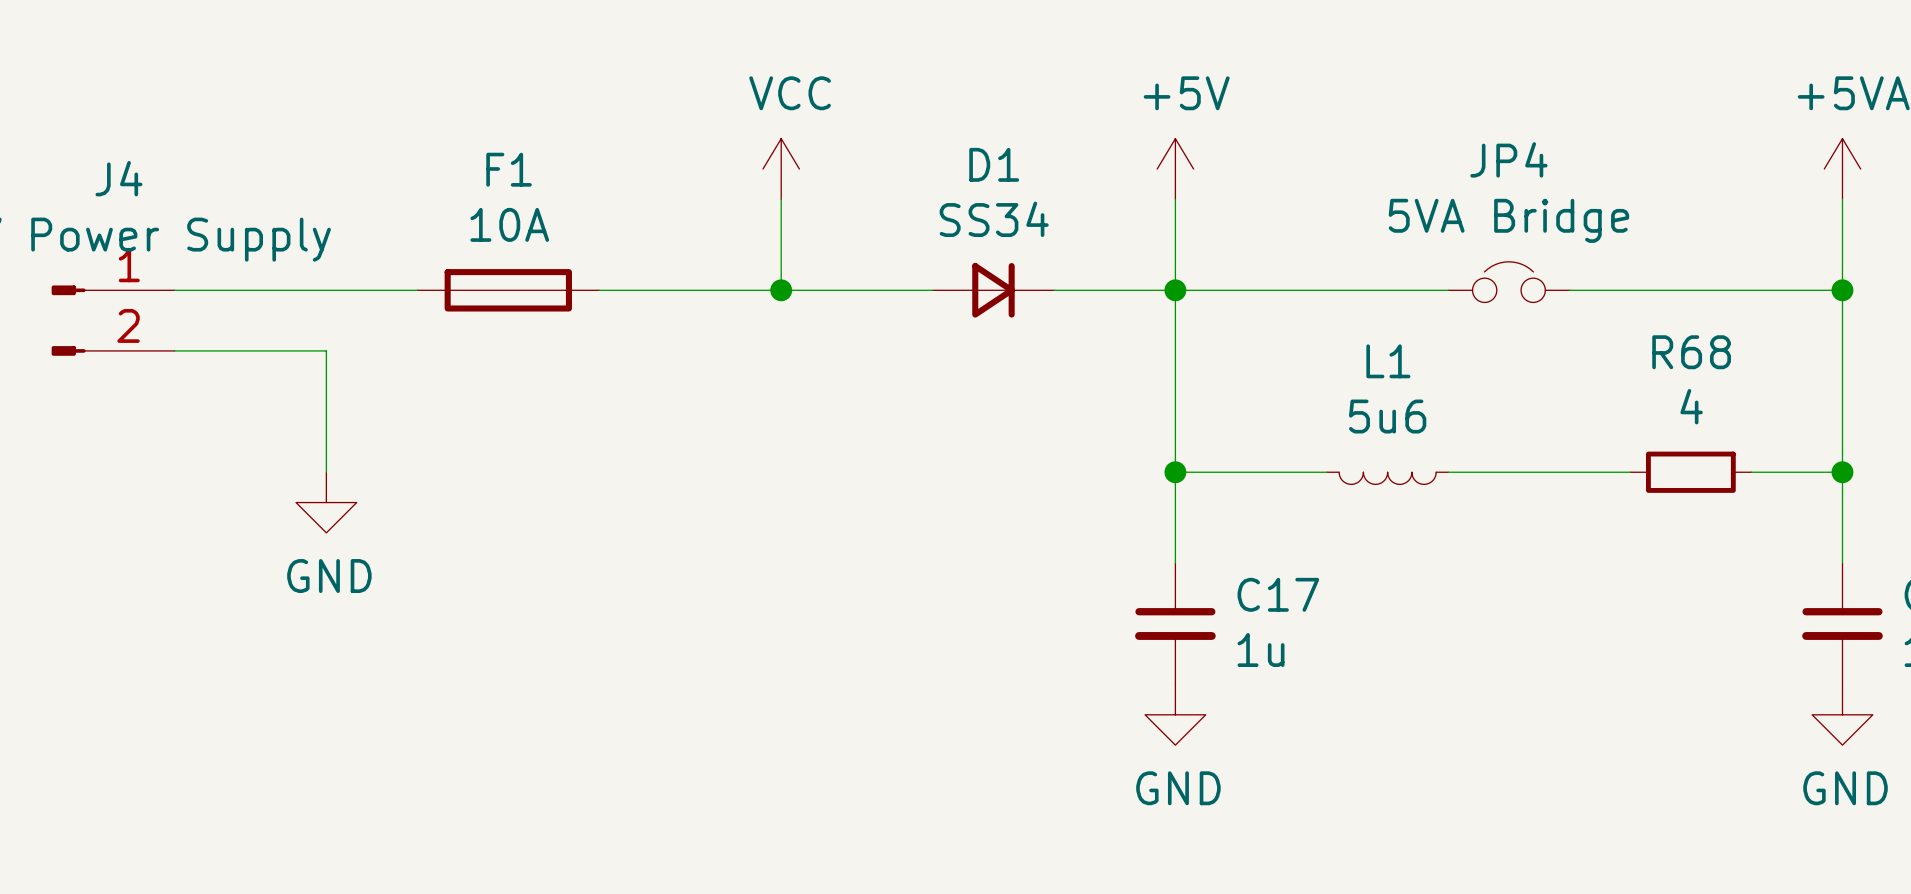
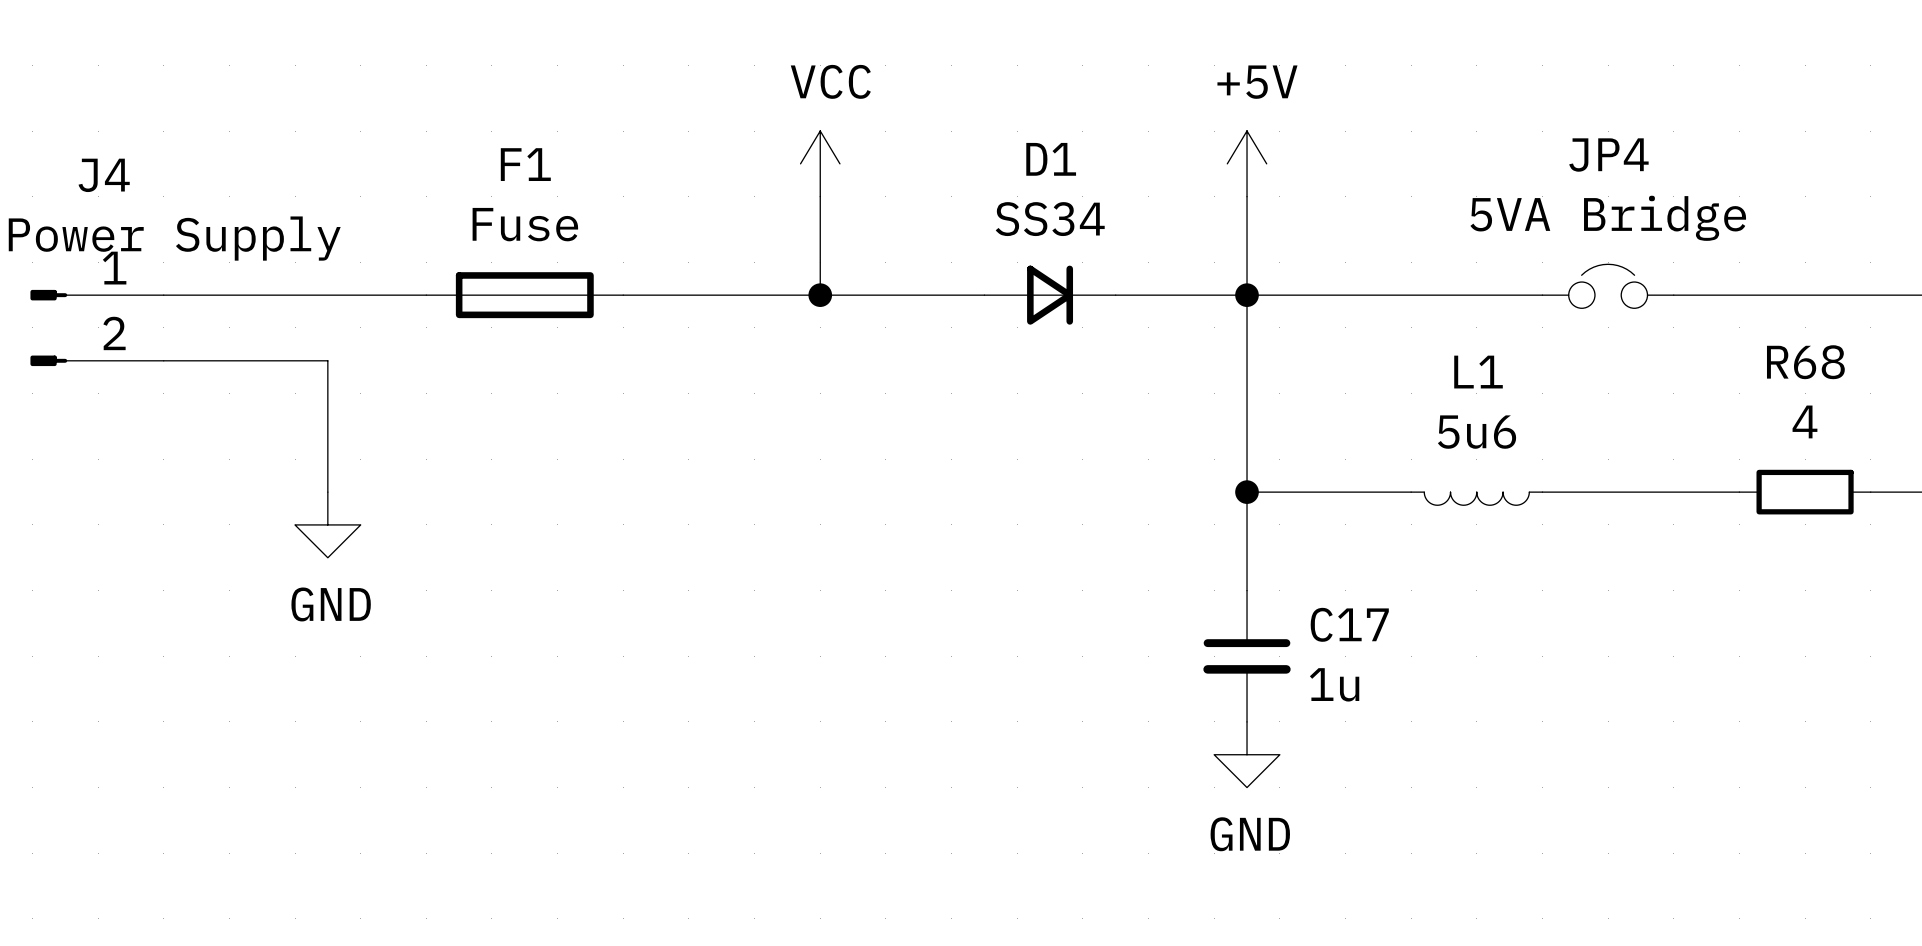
F1 value: 10A (509, 224) -> Fuse (525, 224)

